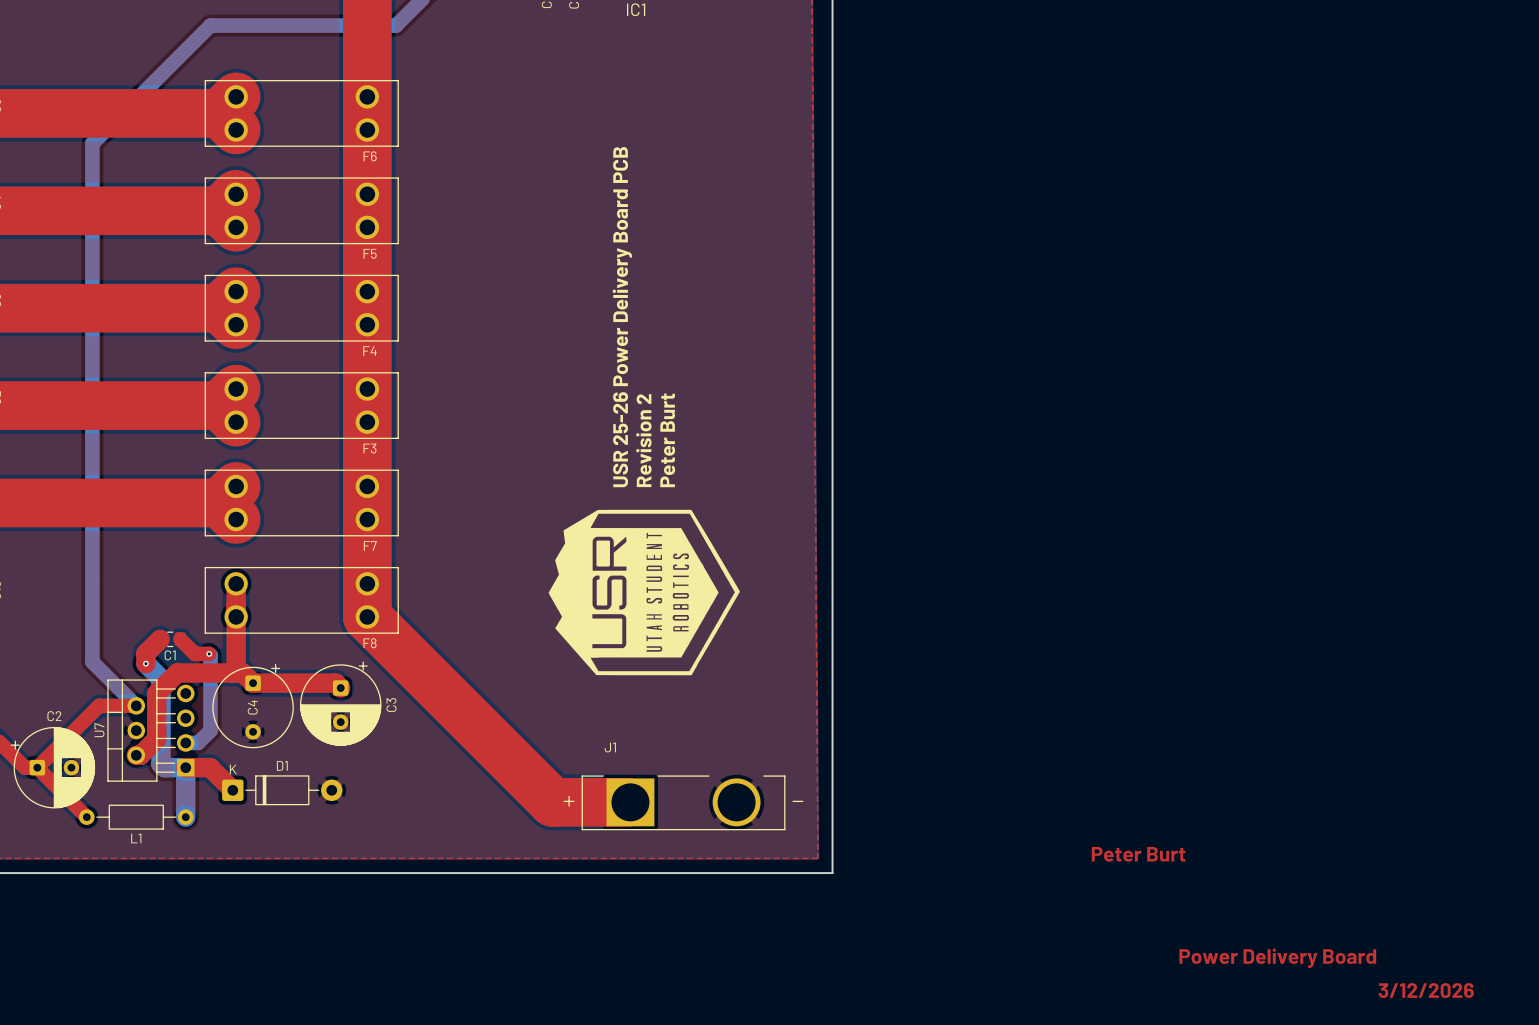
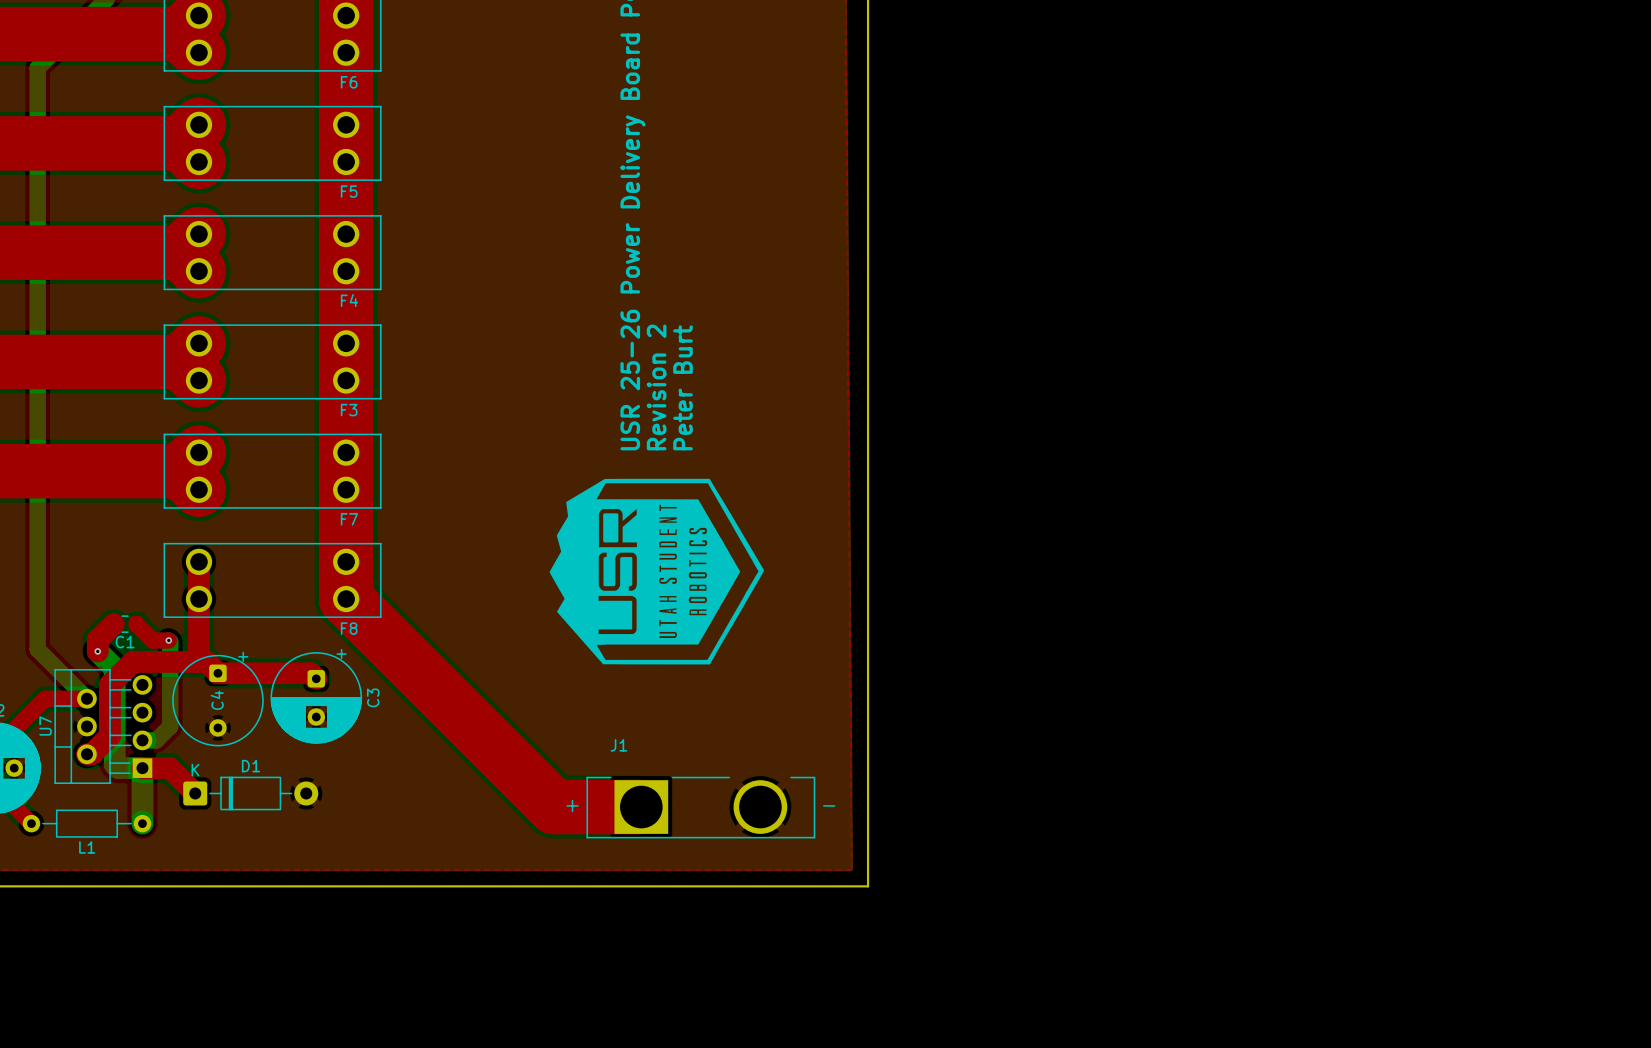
text: Peter Burt (1138, 854) -> none
text: Power Delivery Board (1277, 958) -> none
text: 3/12/2026 (1426, 990) -> none

